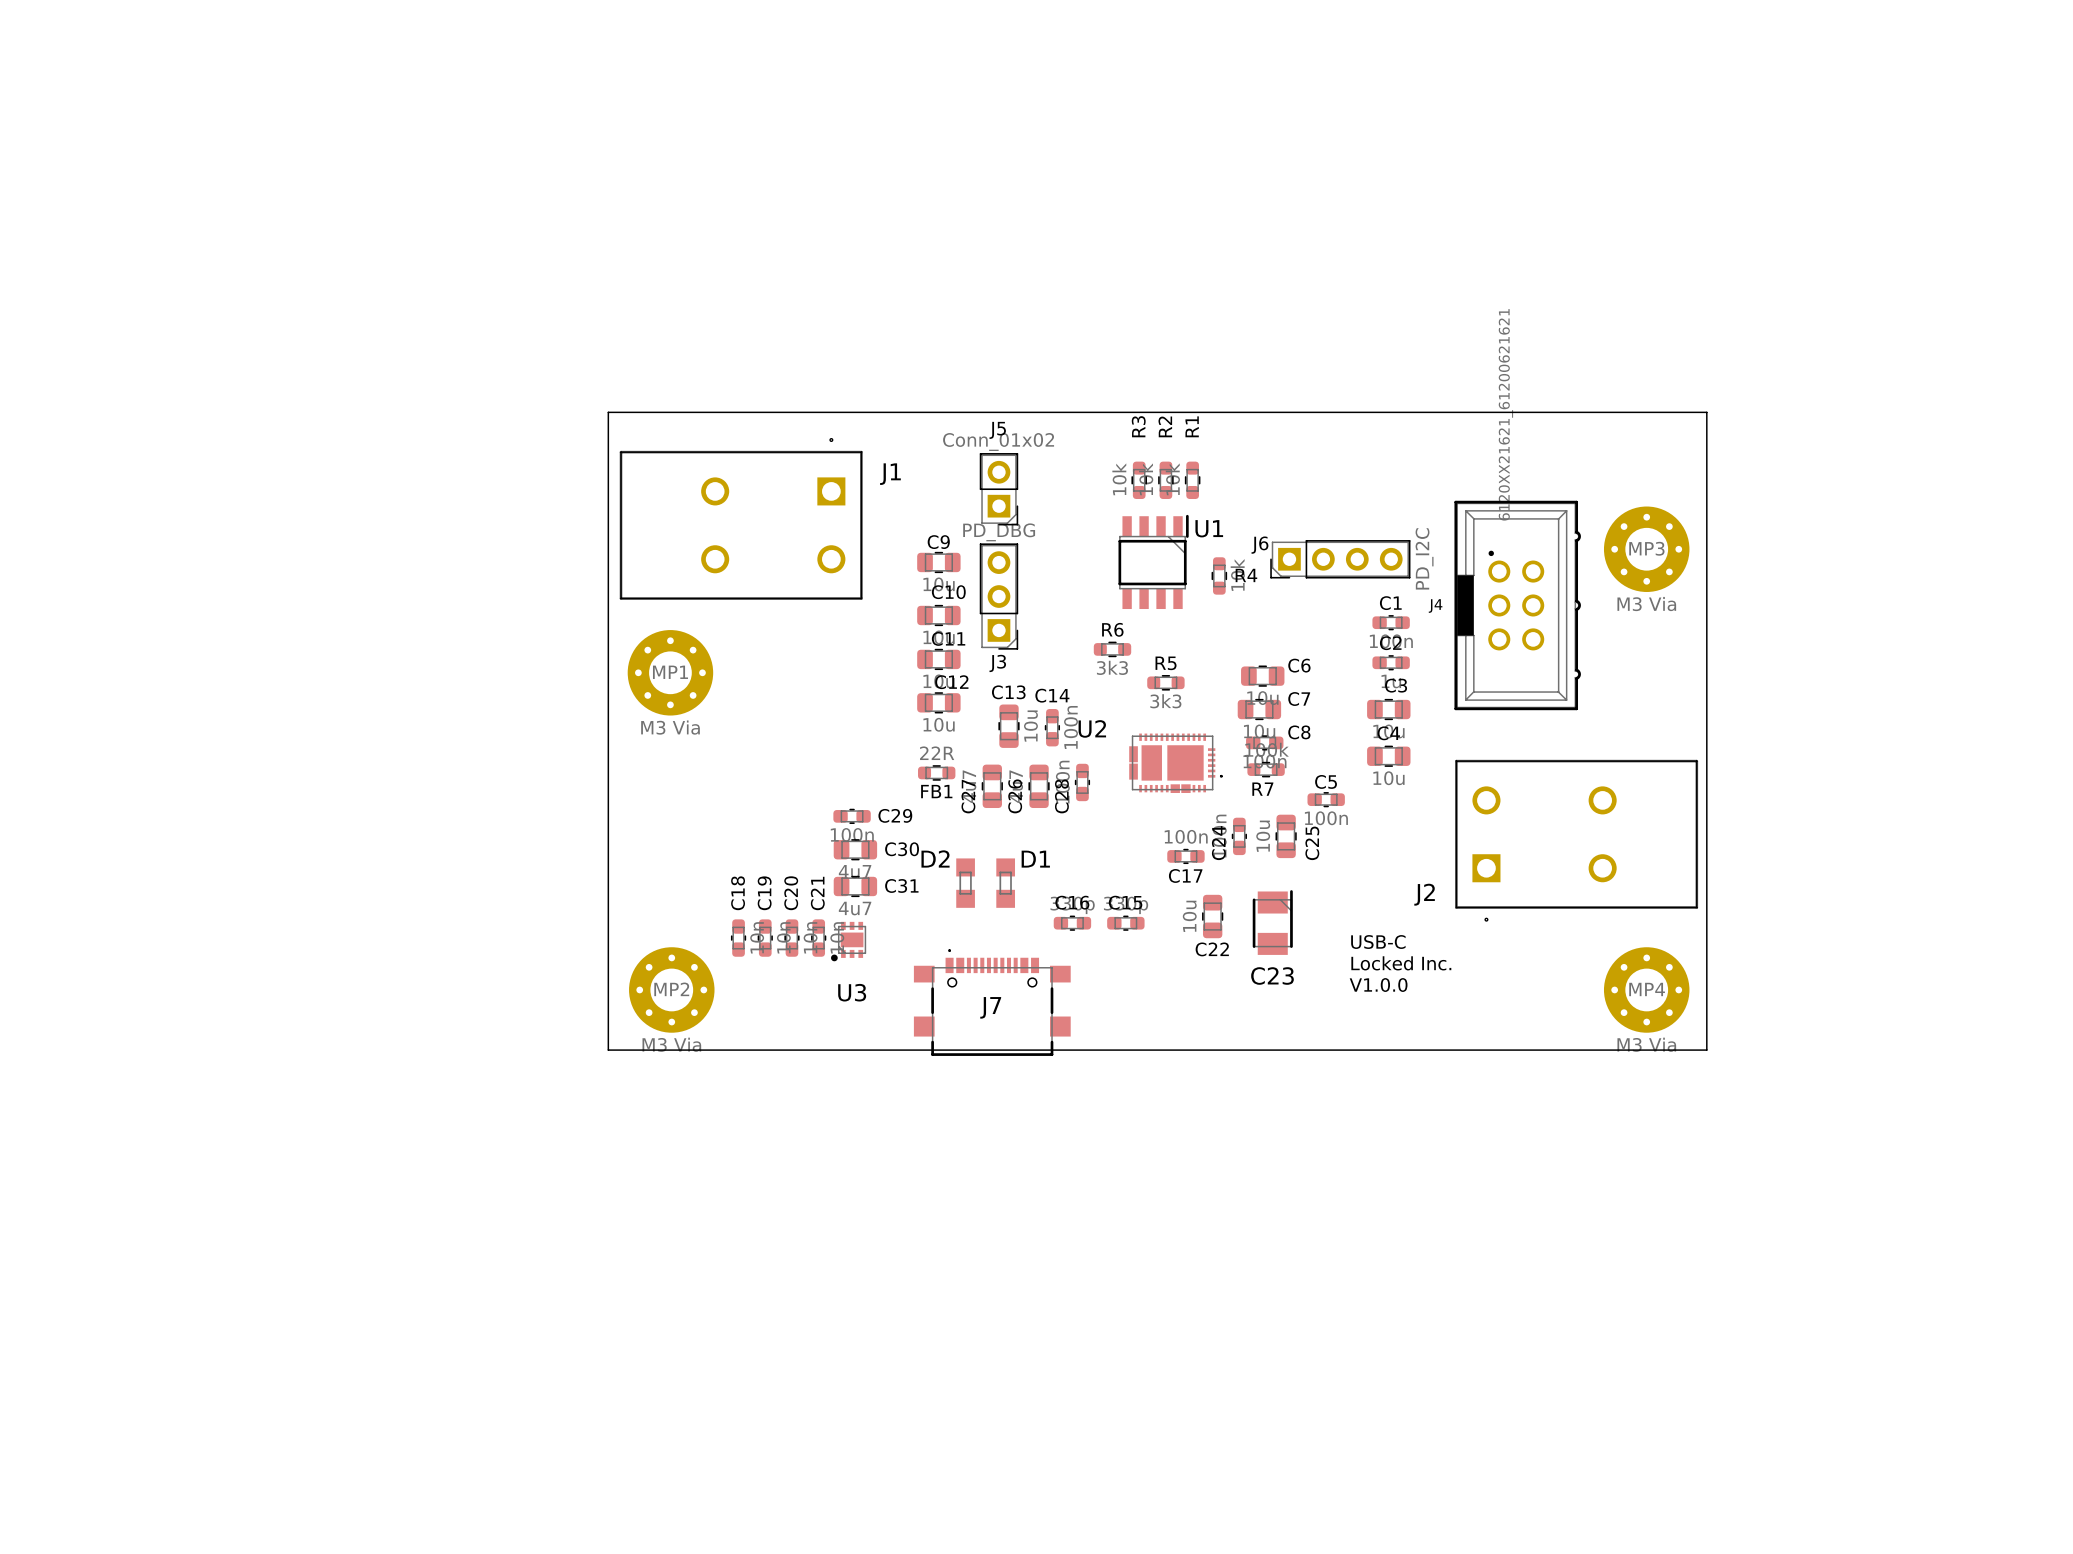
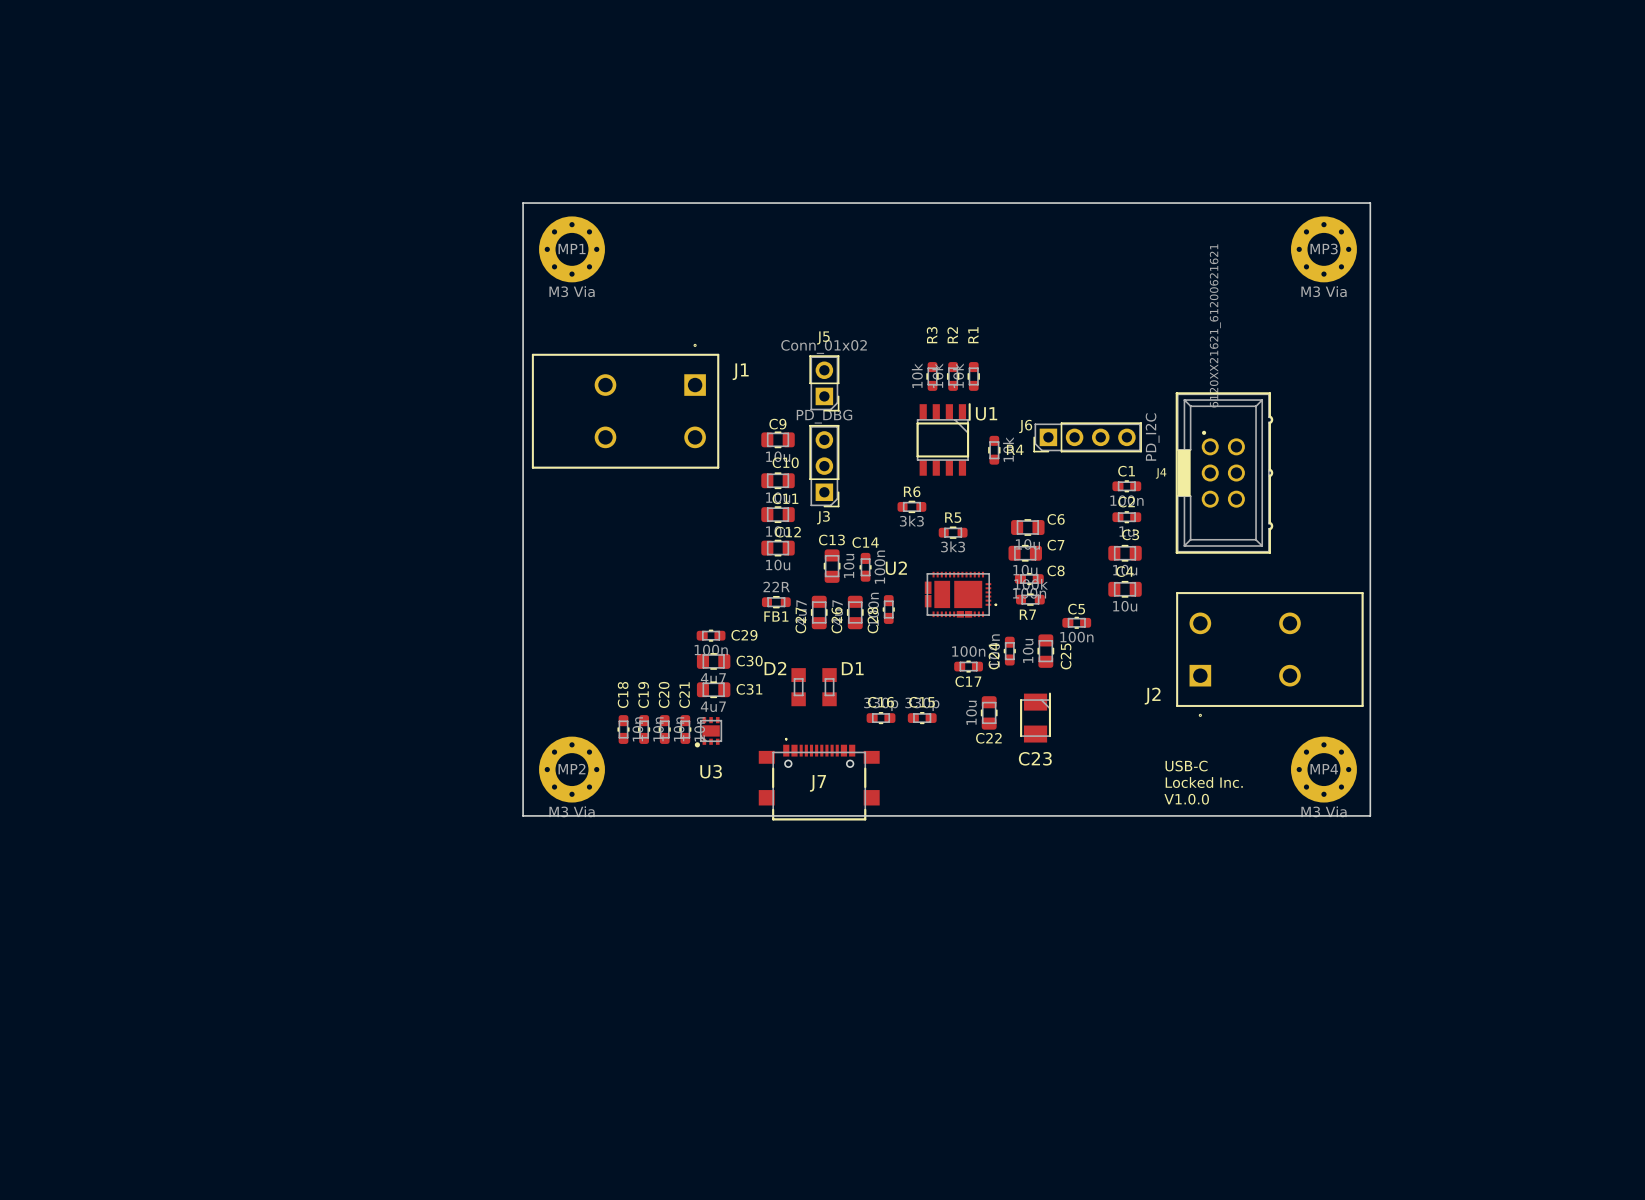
board edge: (608, 412) (1706, 412) -> (523, 324) (523, 203) (1370, 203) (1370, 324)
MP3 position: (1646, 549) -> (1323, 249)
MP1 position: (670, 672) -> (572, 249)
text position: USB-C (1378, 942) -> USB-C (1186, 766)
text position: Locked Inc. (1401, 963) -> Locked Inc. (1204, 782)
text position: V1.0.0 (1378, 985) -> V1.0.0 (1186, 799)

